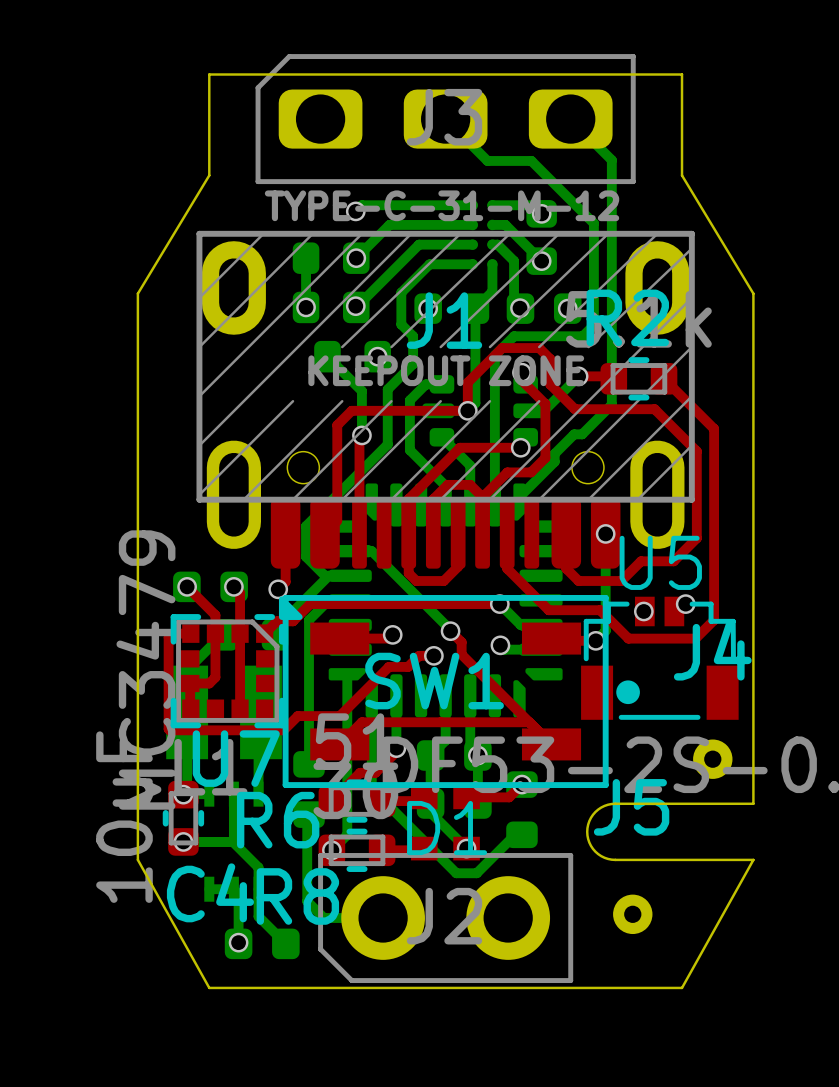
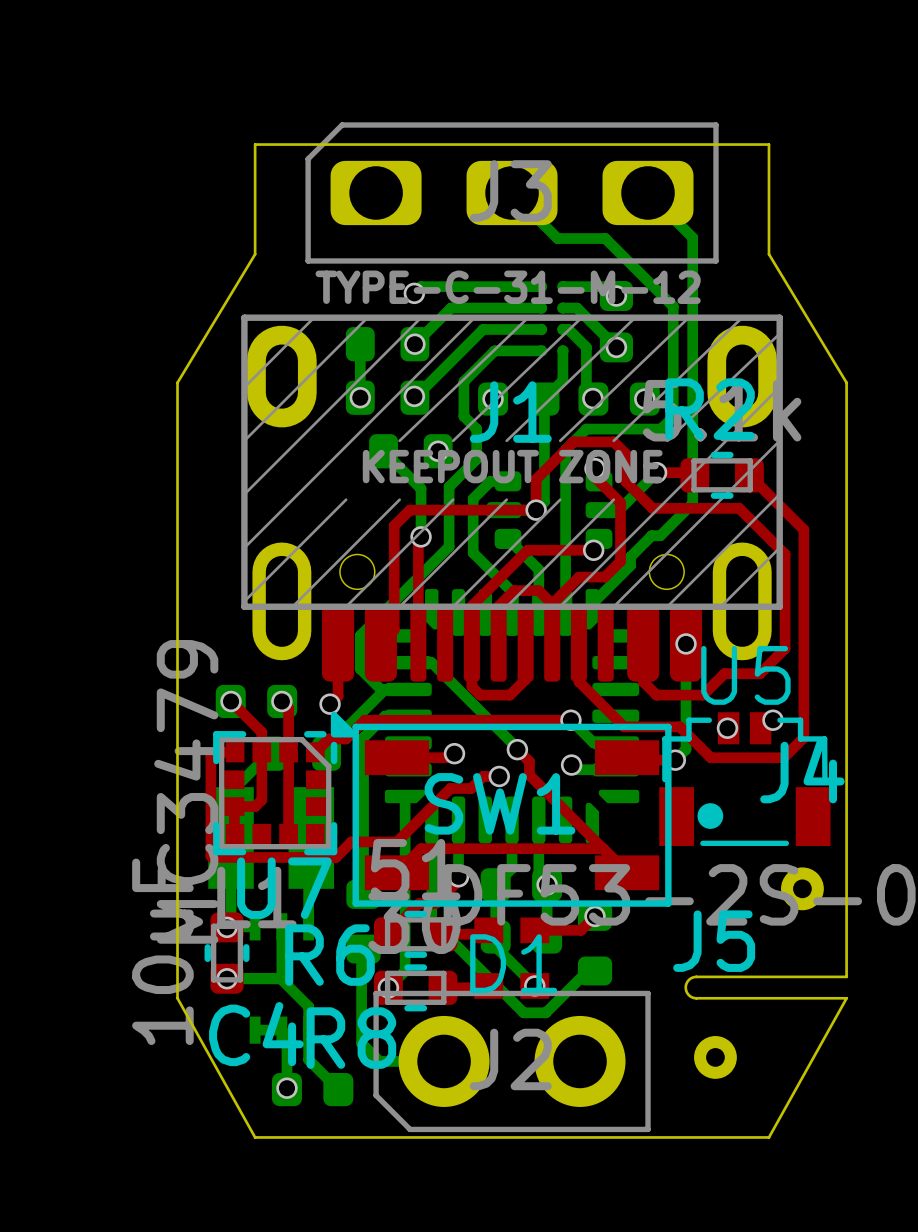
SW1 footprint: [282, 594, 609, 789] -> [352, 723, 672, 907]
board edge: (753, 803) (615, 803) (604, 805) (590, 817) (587, 835) (595, 851) (604, 857) (615, 859) -> (846, 937) (846, 976) (695, 976) (688, 980) (685, 988) (689, 995) (696, 998)

